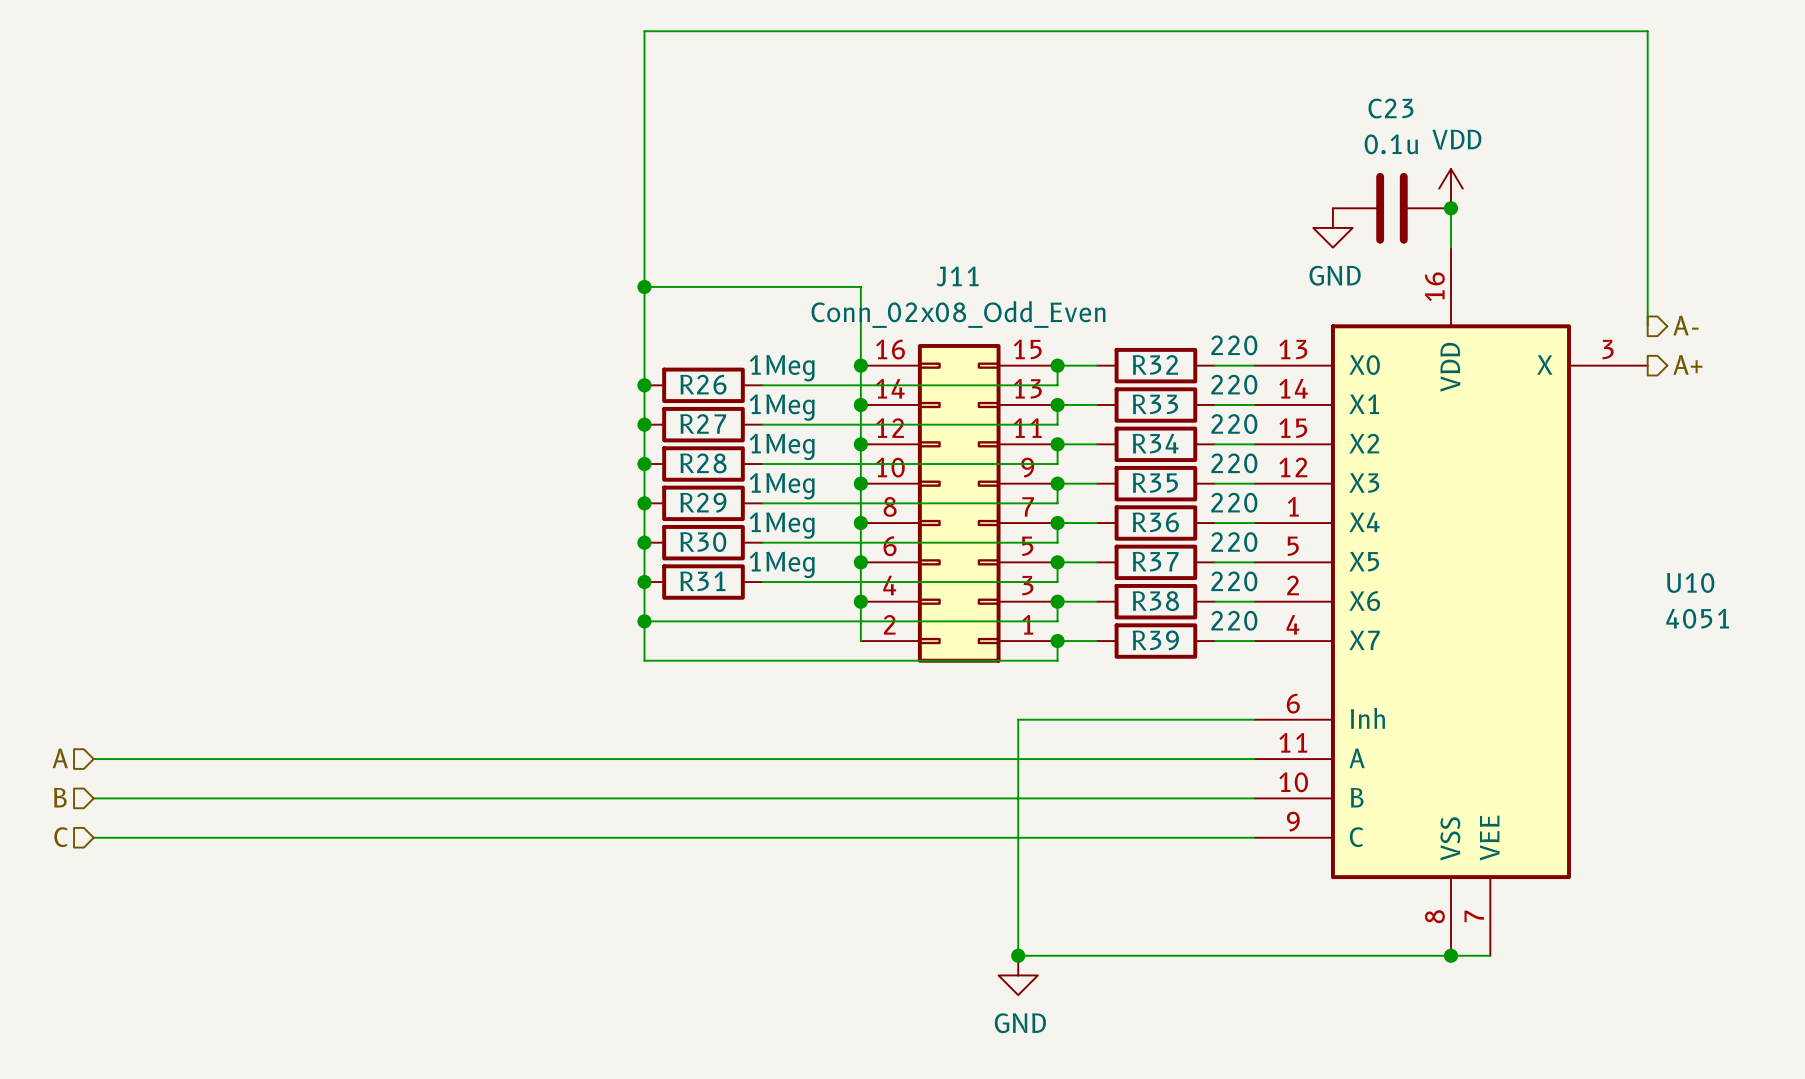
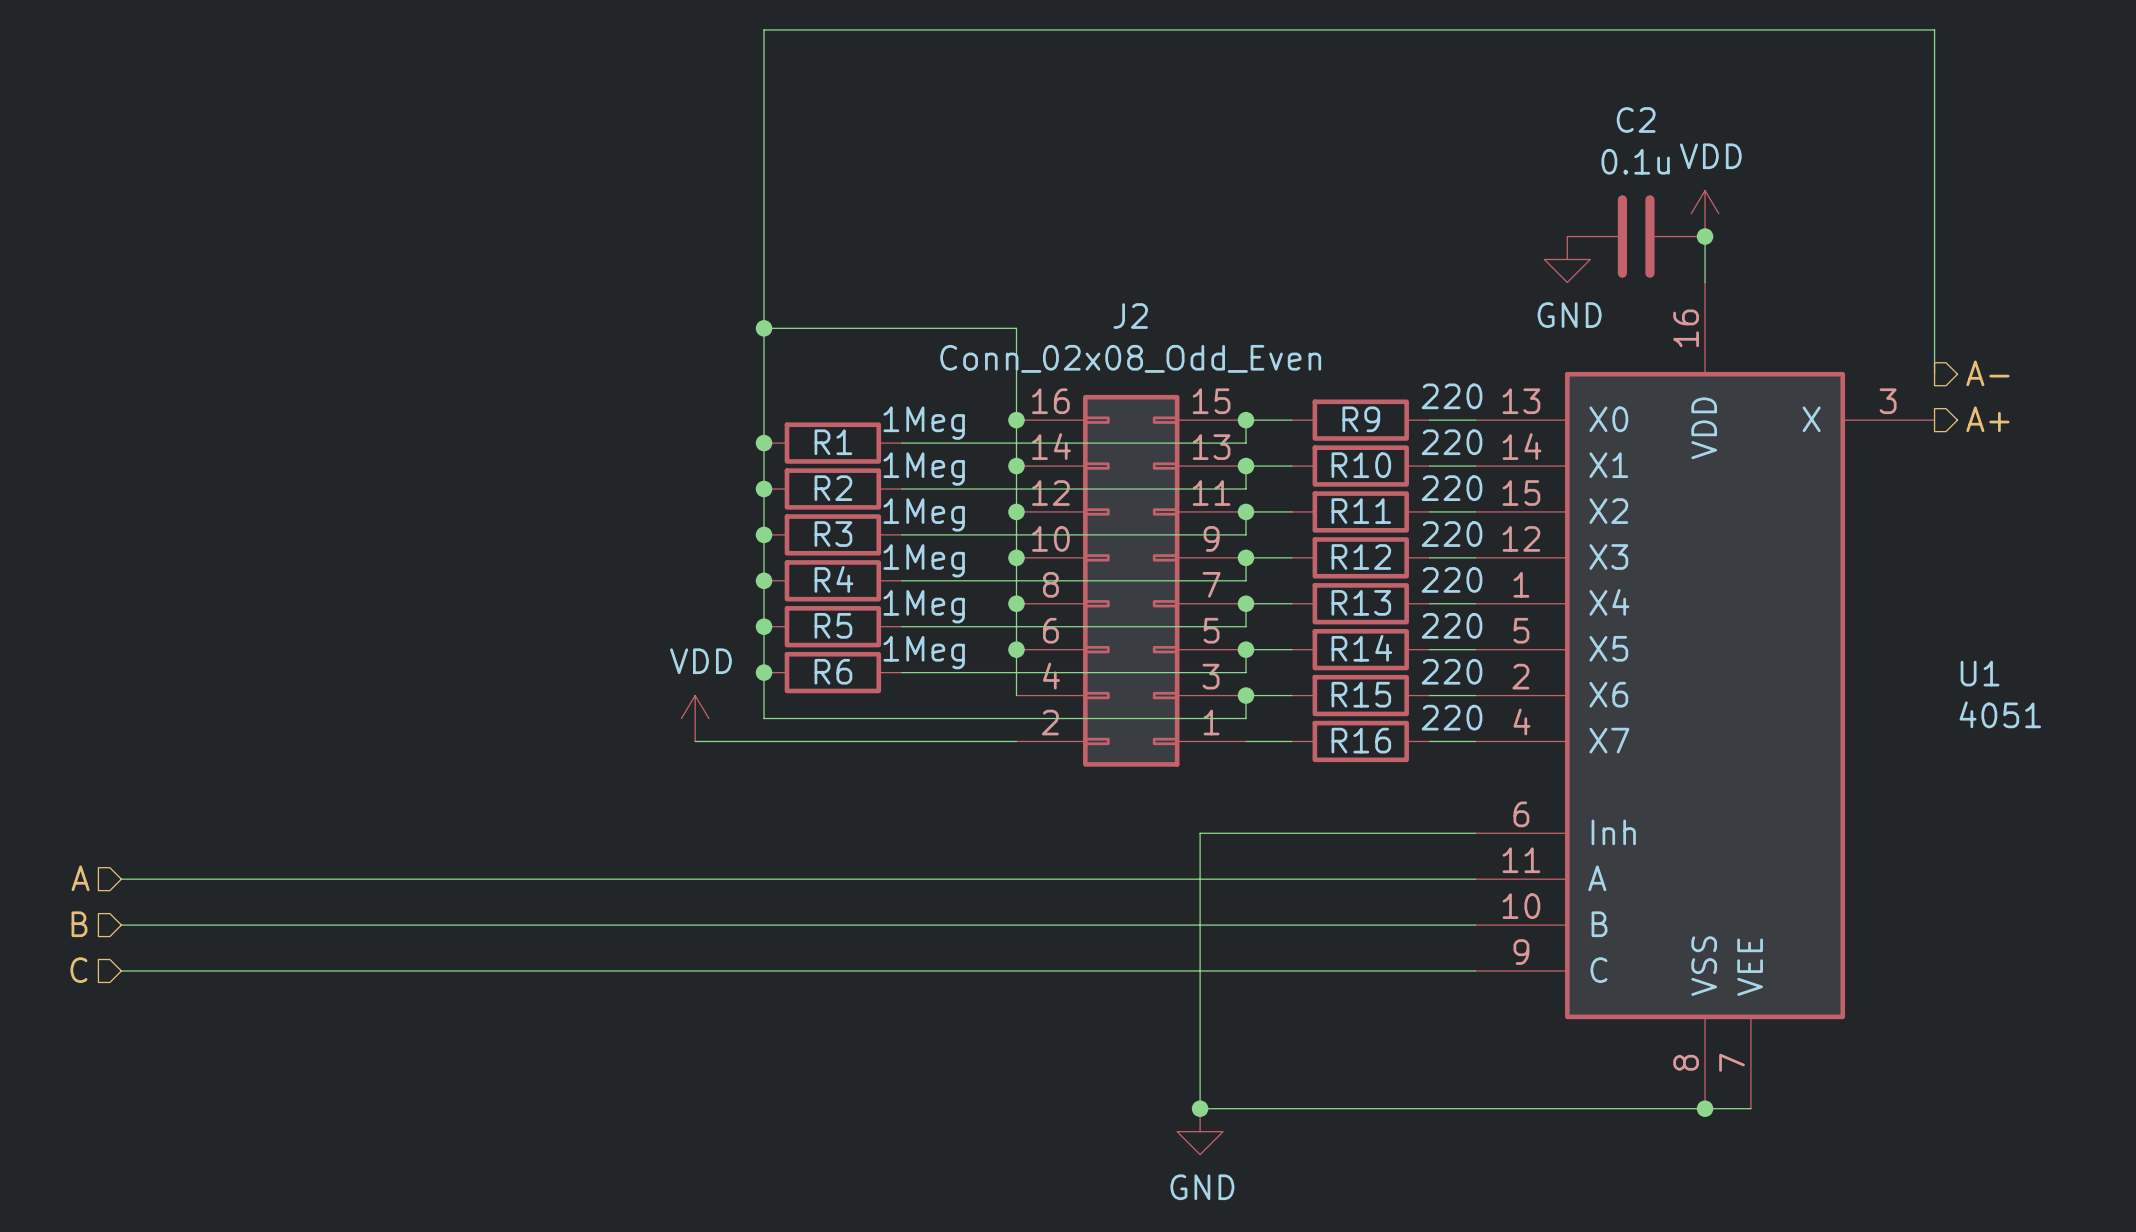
C23 name: C23 (1390, 108) -> C2 (1636, 120)
J11 name: J11 (957, 276) -> J2 (1130, 316)
R32 name: R32 (1155, 364) -> R9 (1361, 419)
R26 name: R26 (703, 384) -> R1 (833, 442)
R33 name: R33 (1155, 404) -> R10 (1361, 465)
R27 name: R27 (703, 423) -> R2 (833, 488)
R34 name: R34 (1155, 443) -> R11 (1361, 511)
R28 name: R28 (703, 463) -> R3 (833, 534)
R35 name: R35 (1155, 482) -> R12 (1361, 557)
R29 name: R29 (703, 502) -> R4 (833, 579)
R36 name: R36 (1155, 522) -> R13 (1361, 602)
R30 name: R30 (703, 542) -> R5 (833, 625)
R37 name: R37 (1155, 561) -> R14 (1361, 648)
R31 name: R31 (702, 581) -> R6 (833, 671)
U10 name: U10 (1690, 582) -> U1 (1980, 673)
wire: (860, 601) (860, 641) -> (695, 741) (1016, 741)
junction: (860, 601) -> none
R38 name: R38 (1155, 601) -> R15 (1361, 694)
power symbol: none -> VDD (695, 718)
wire: (644, 621) (644, 660) (1057, 660) (1057, 641) -> none
junction: (644, 621) -> none
R39 name: R39 (1155, 640) -> R16 (1361, 740)
junction: (1057, 641) -> none

